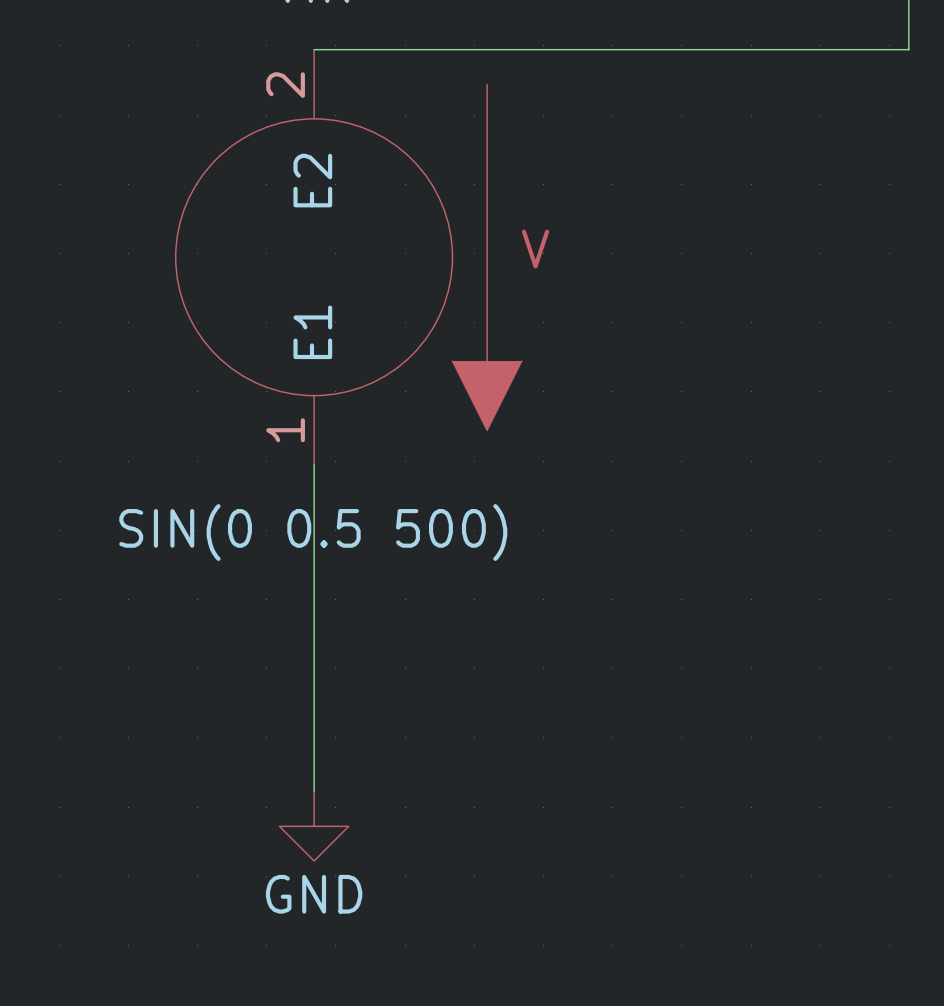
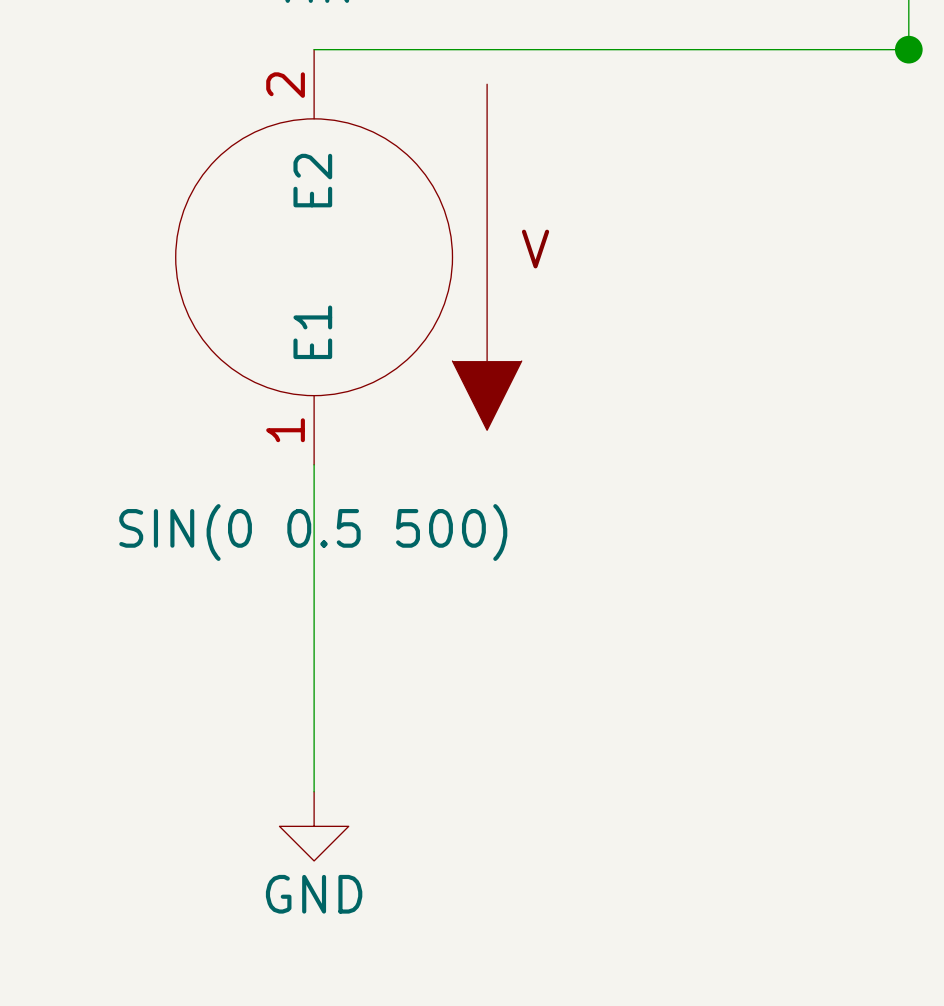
junction: none -> (908, 49)

